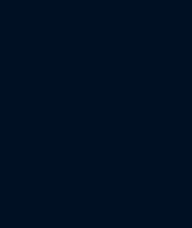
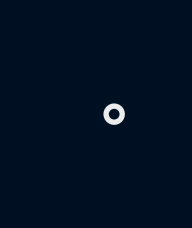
via: none -> (114, 114)

